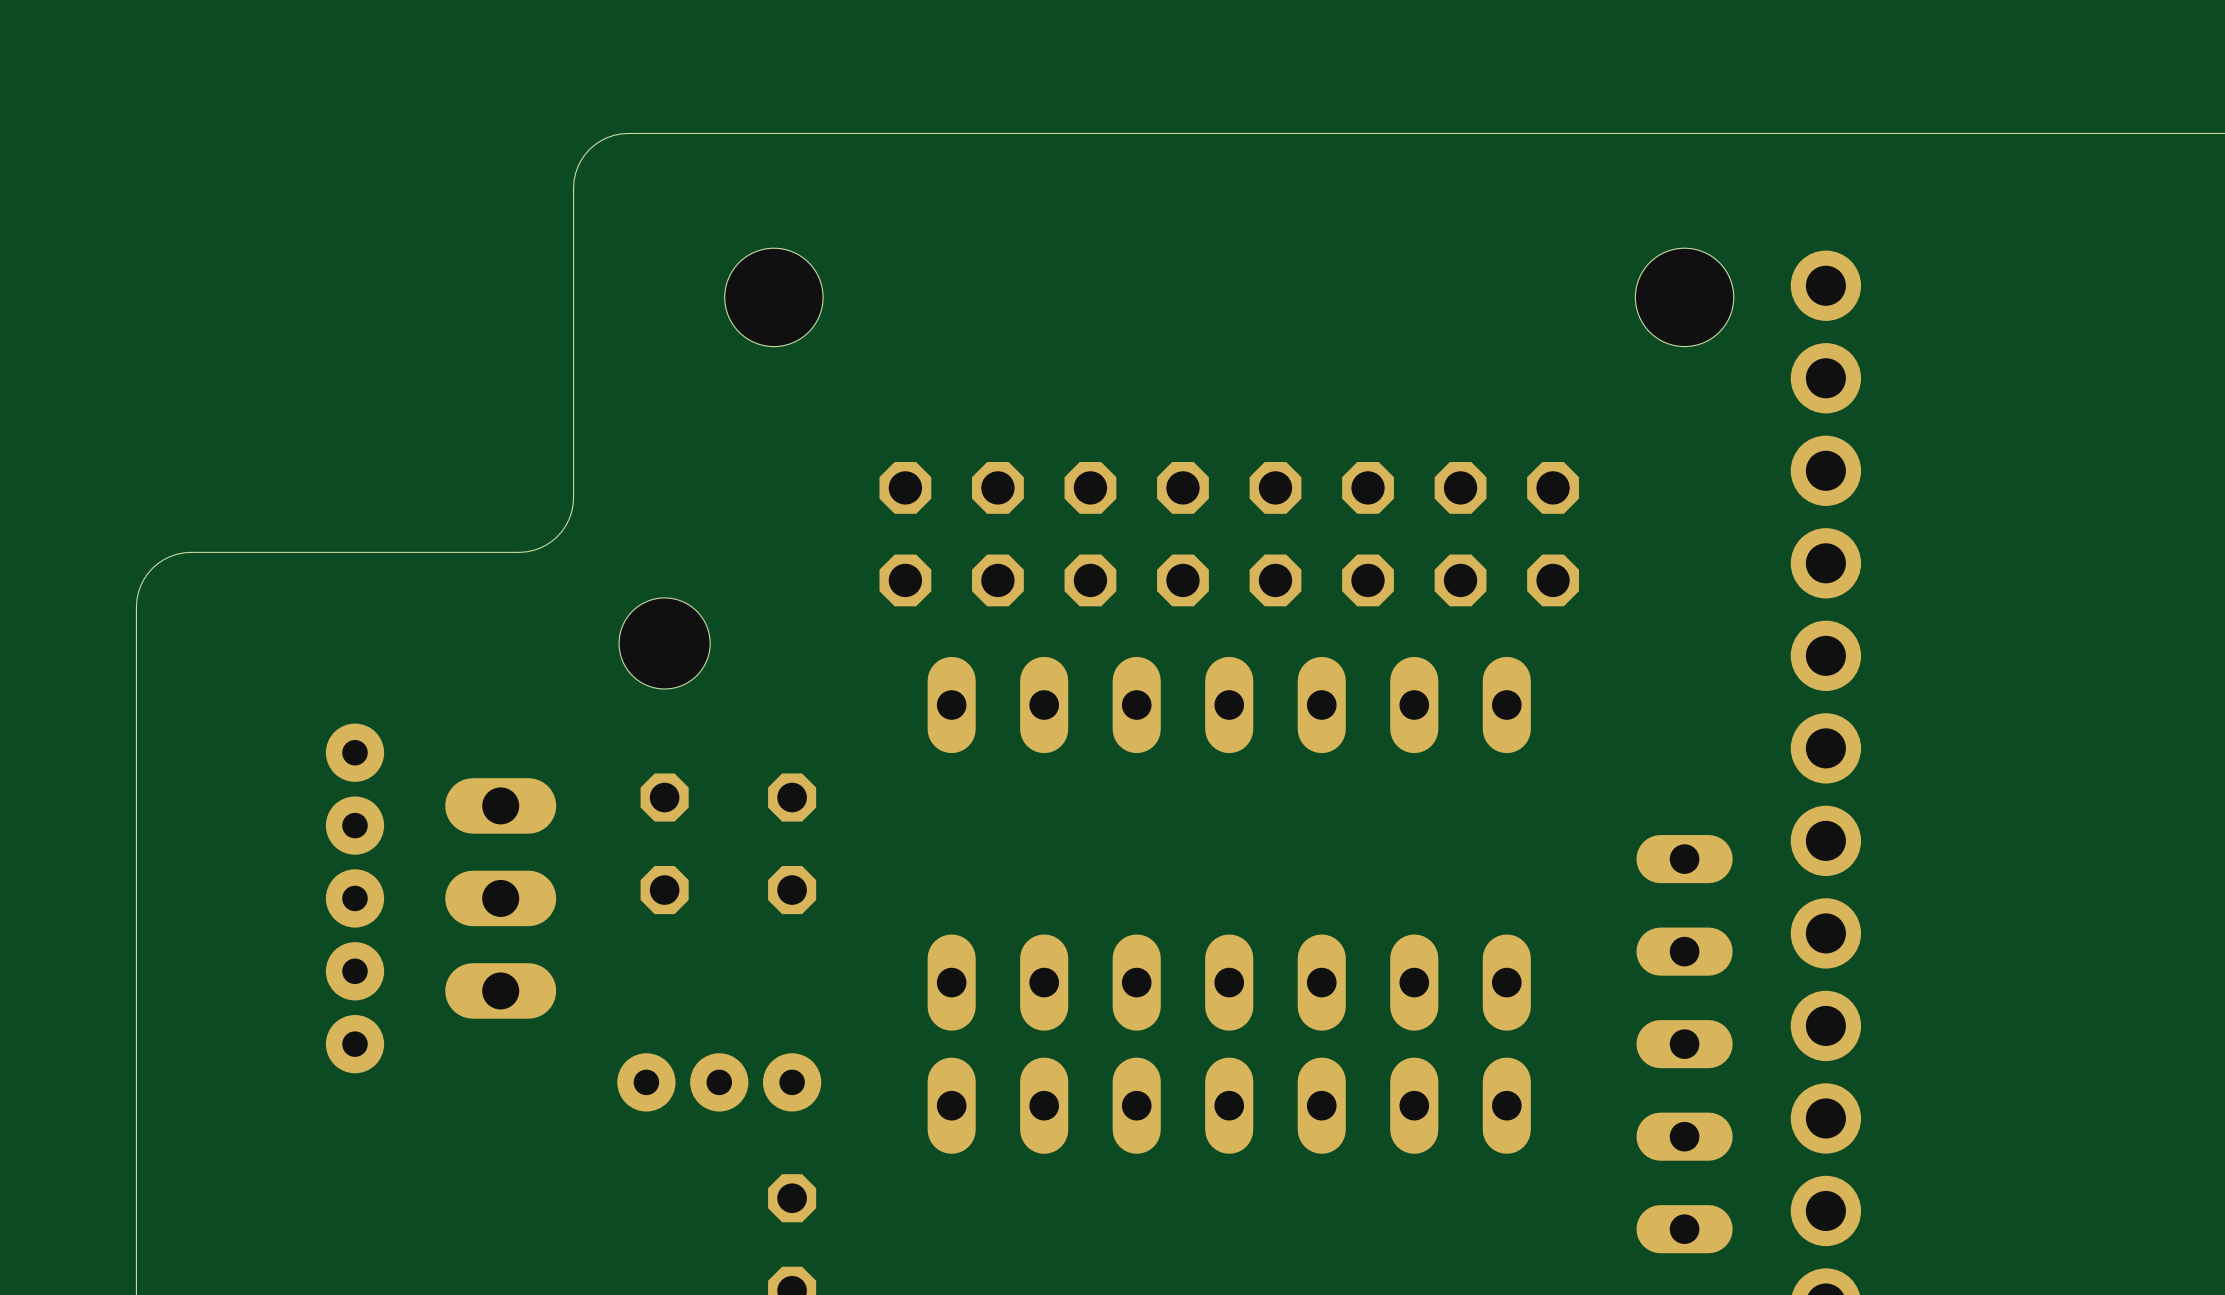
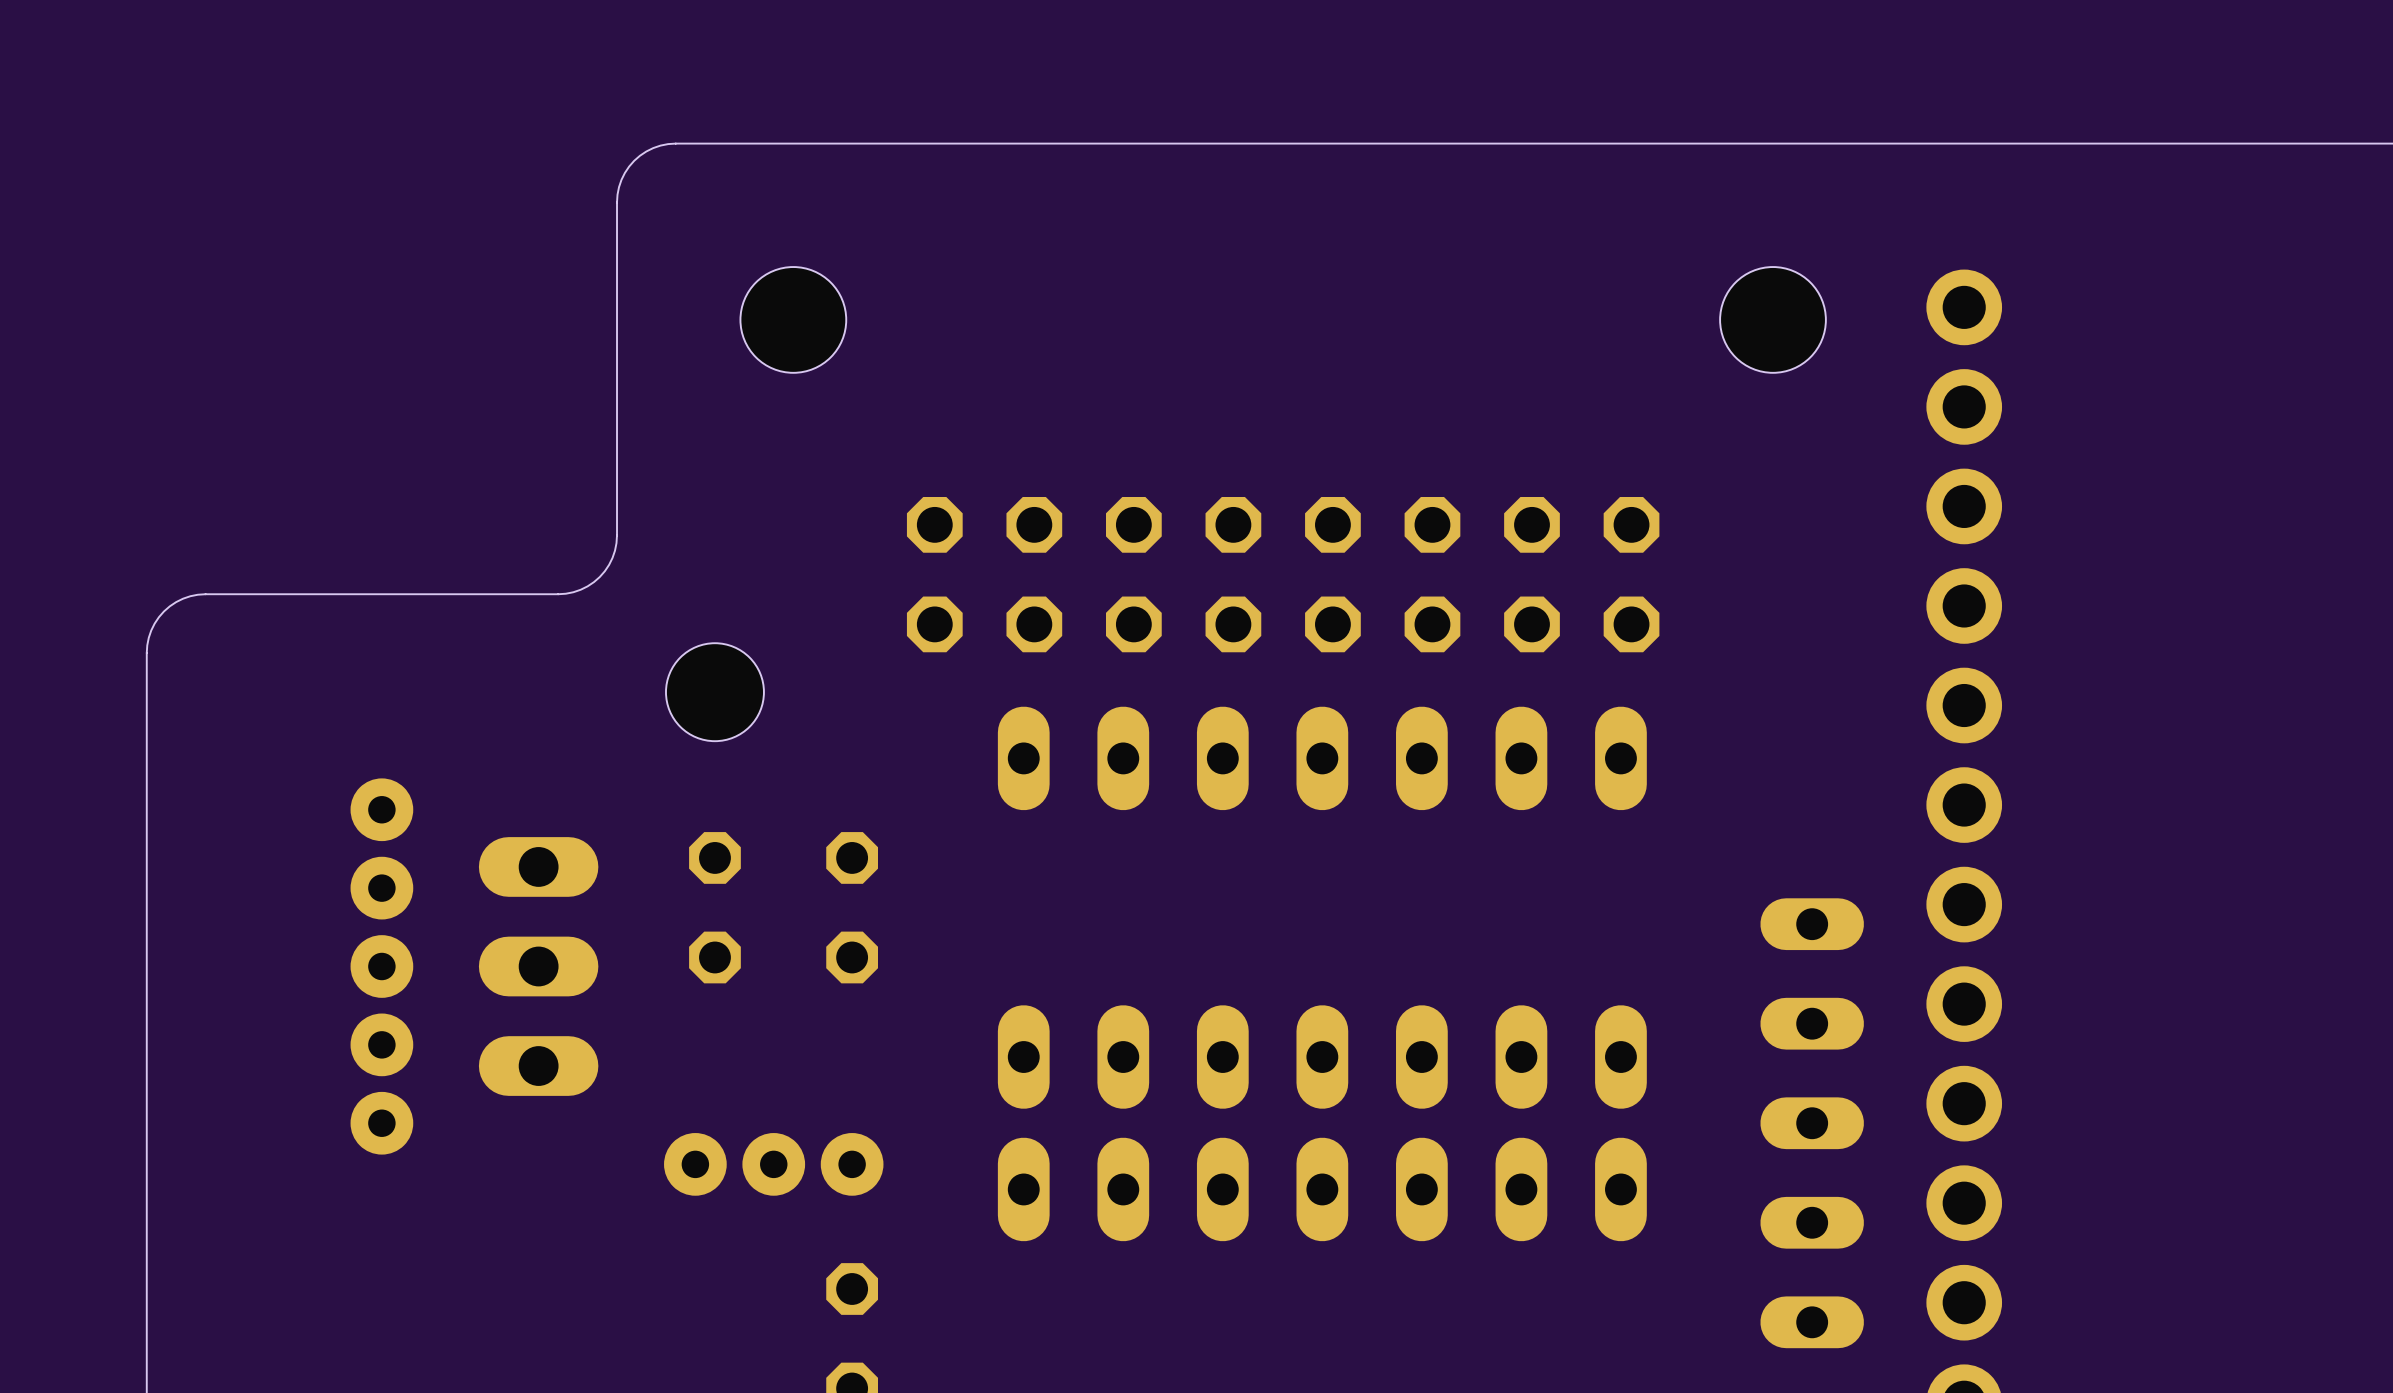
hole position: (773, 297) -> (793, 319)
hole position: (1684, 297) -> (1772, 319)
part position: (1229, 534) -> (1283, 574)

